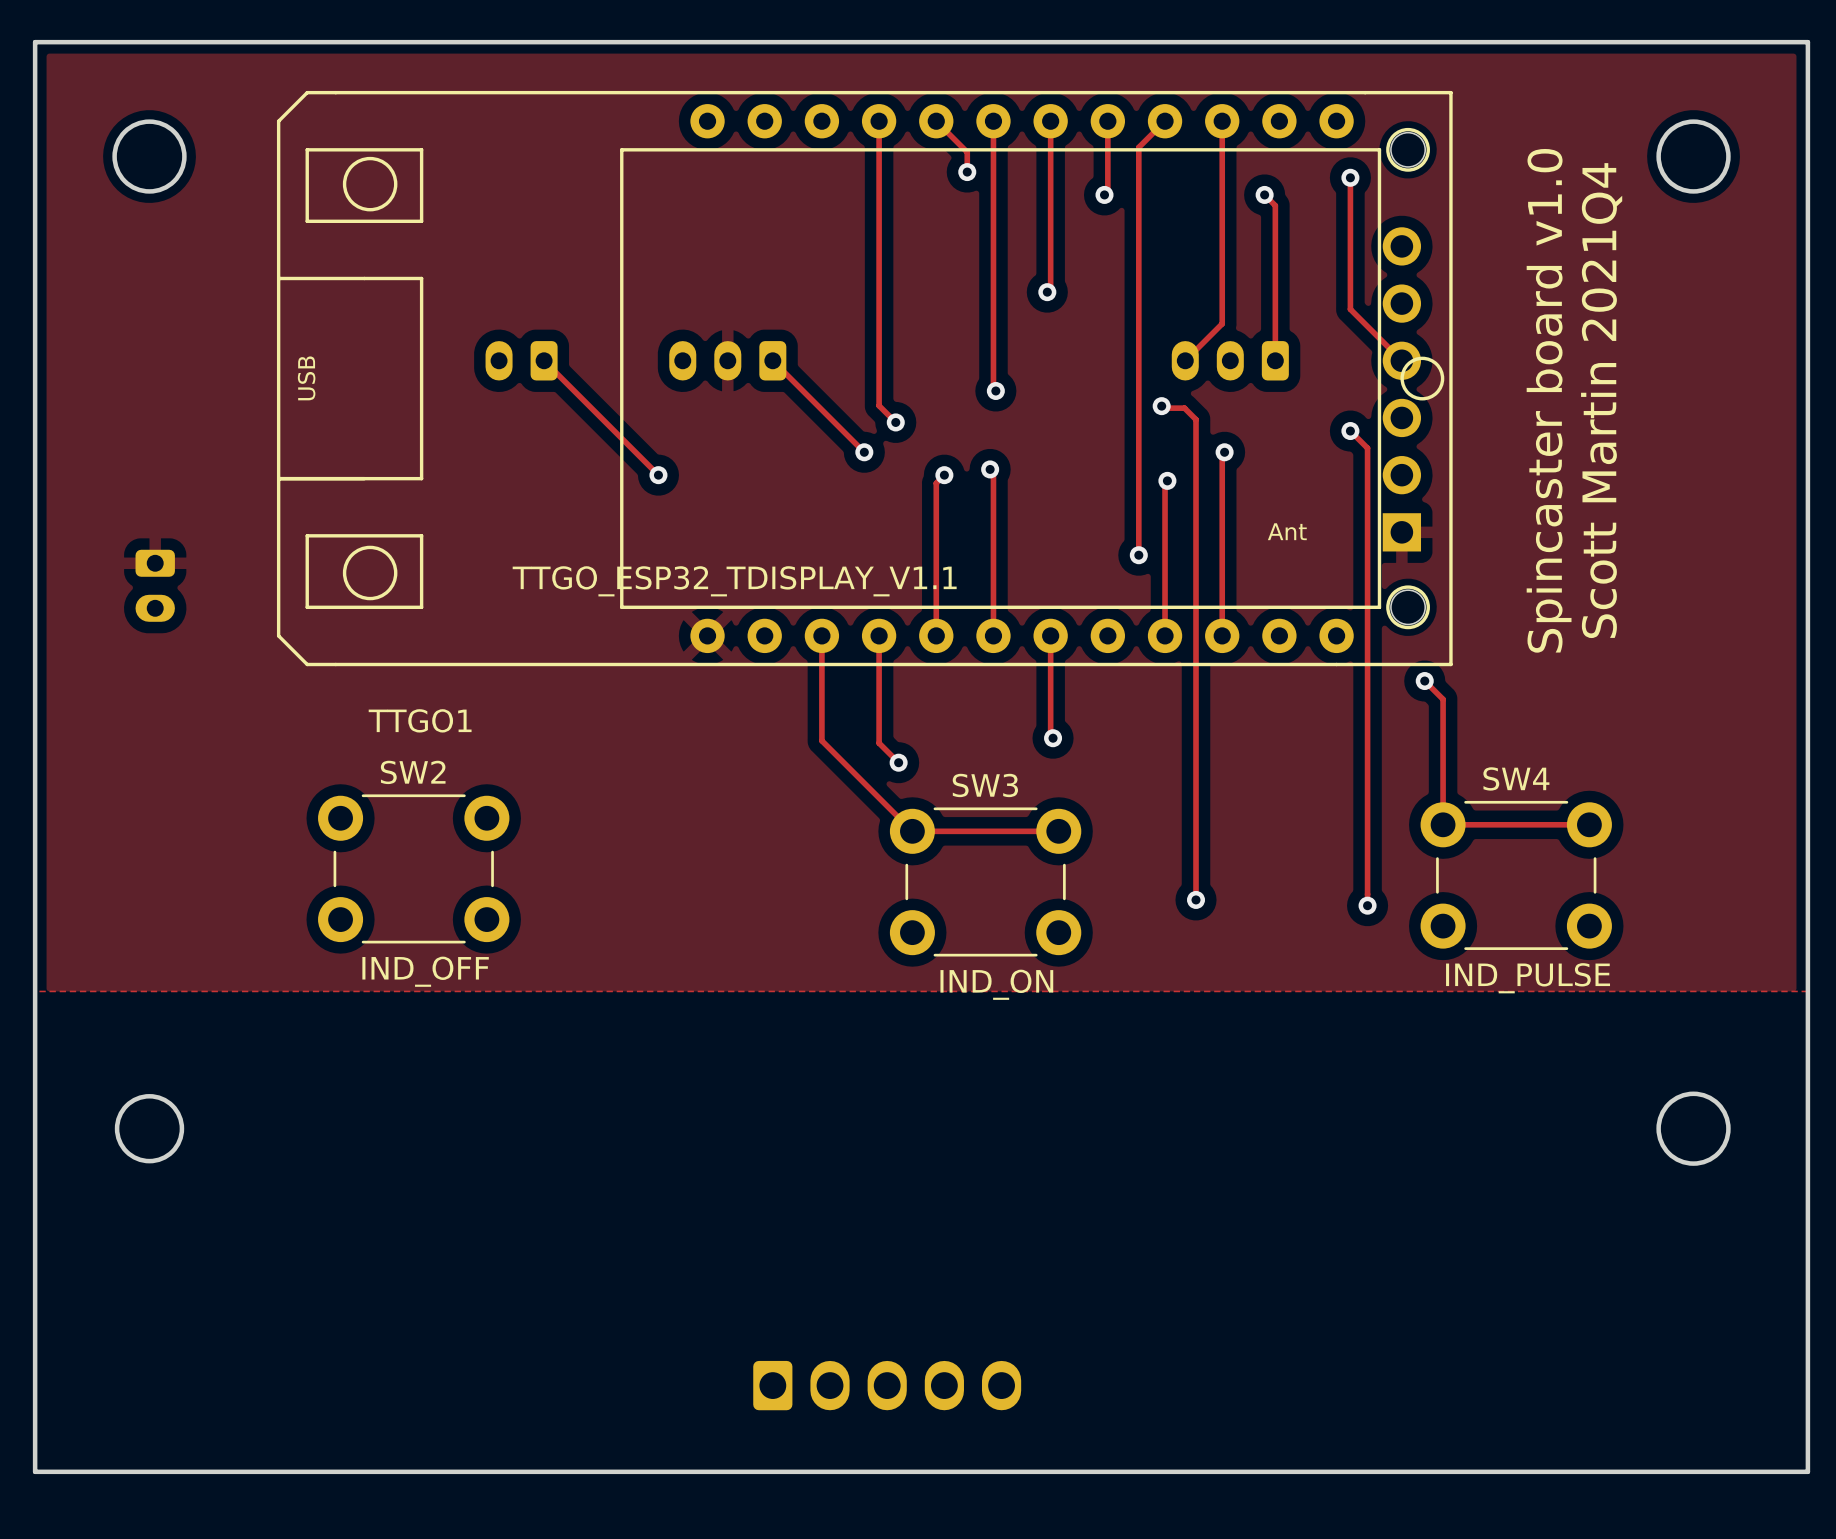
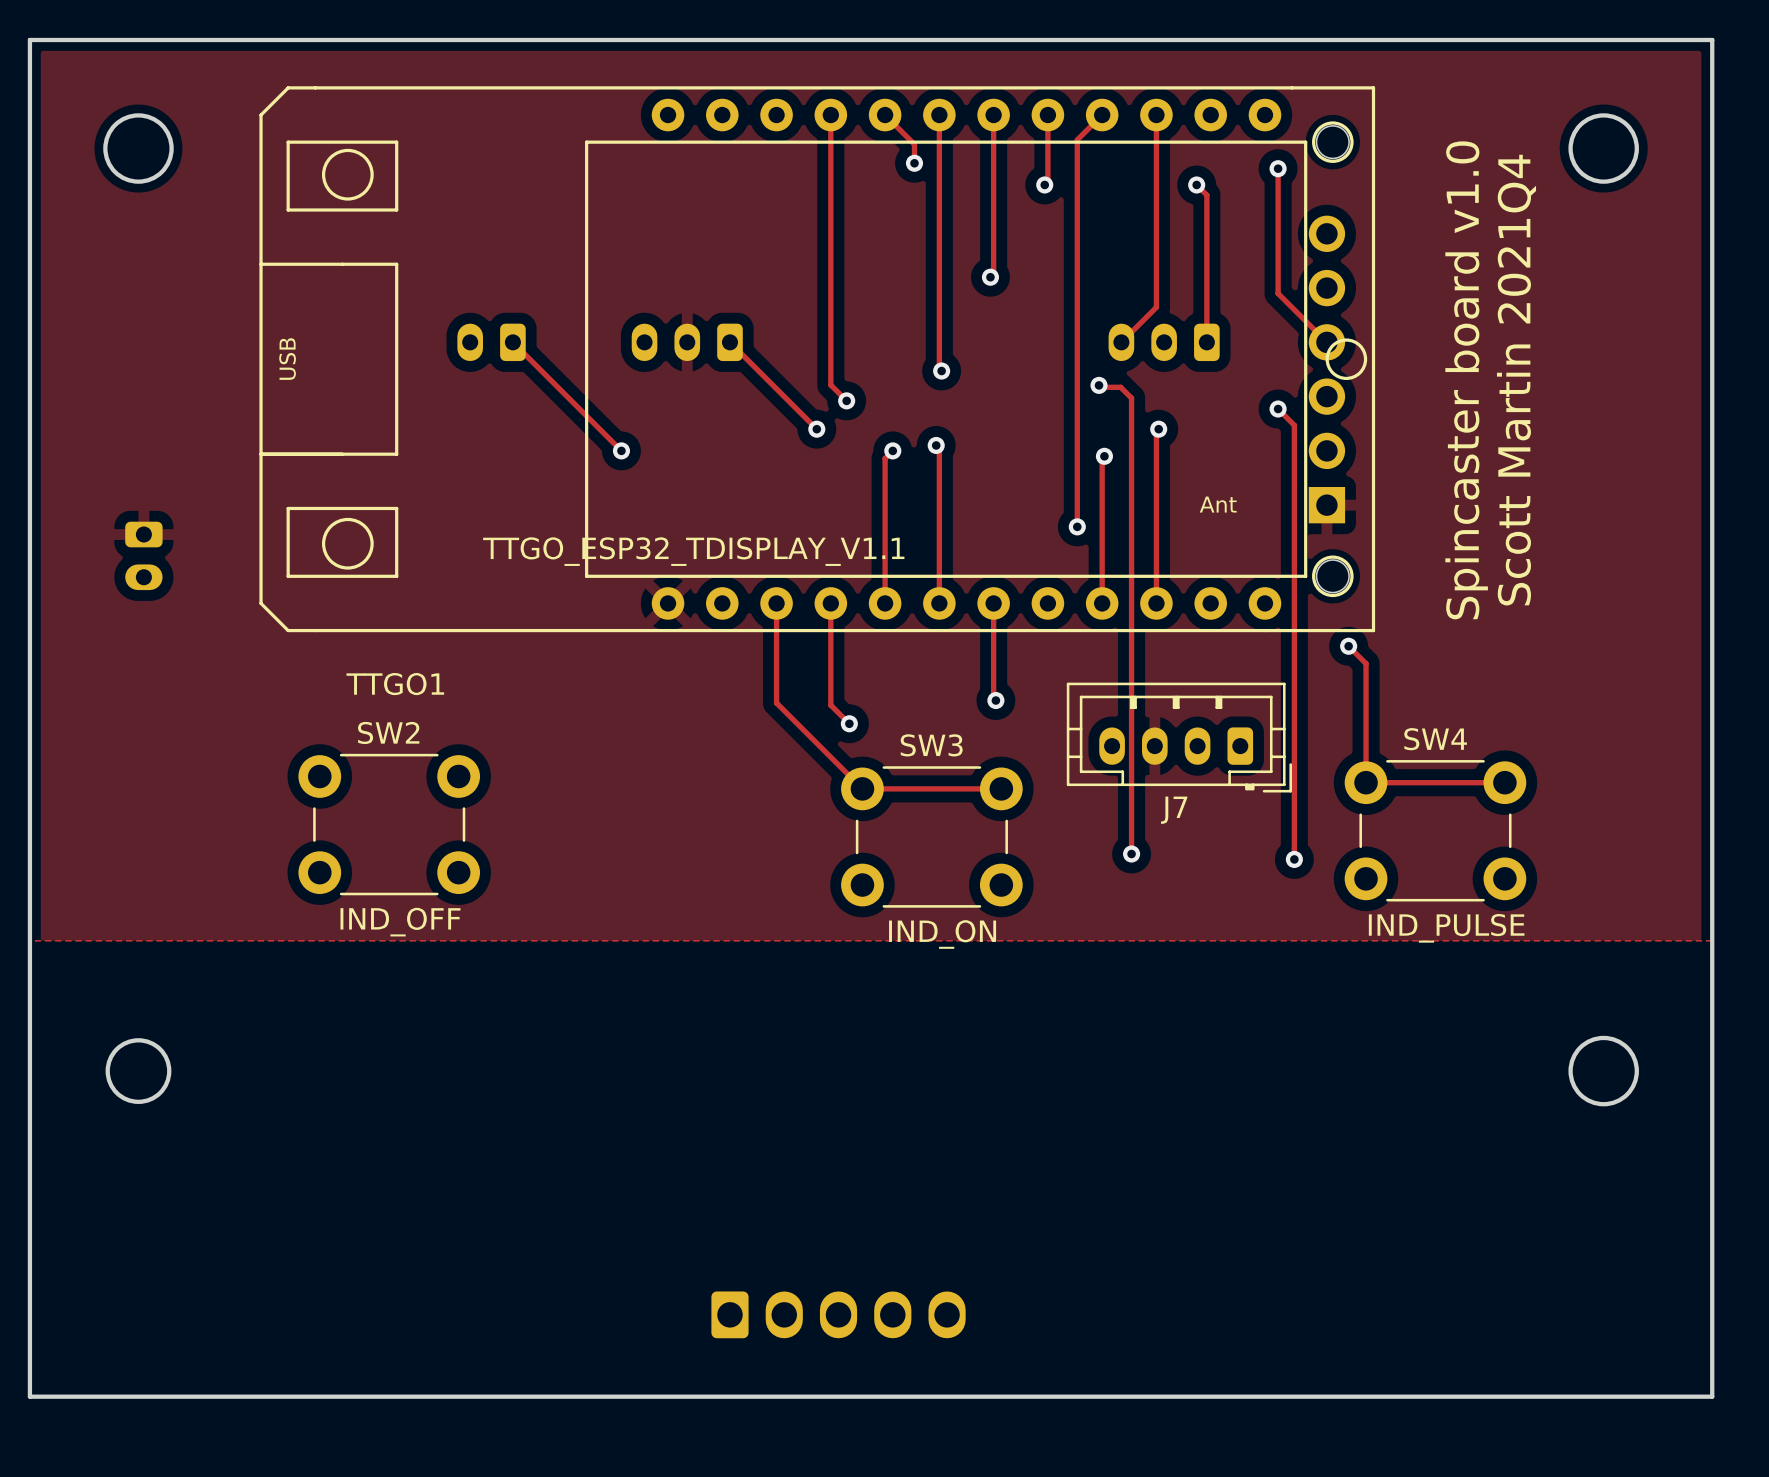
J7: none -> (1179, 737)

